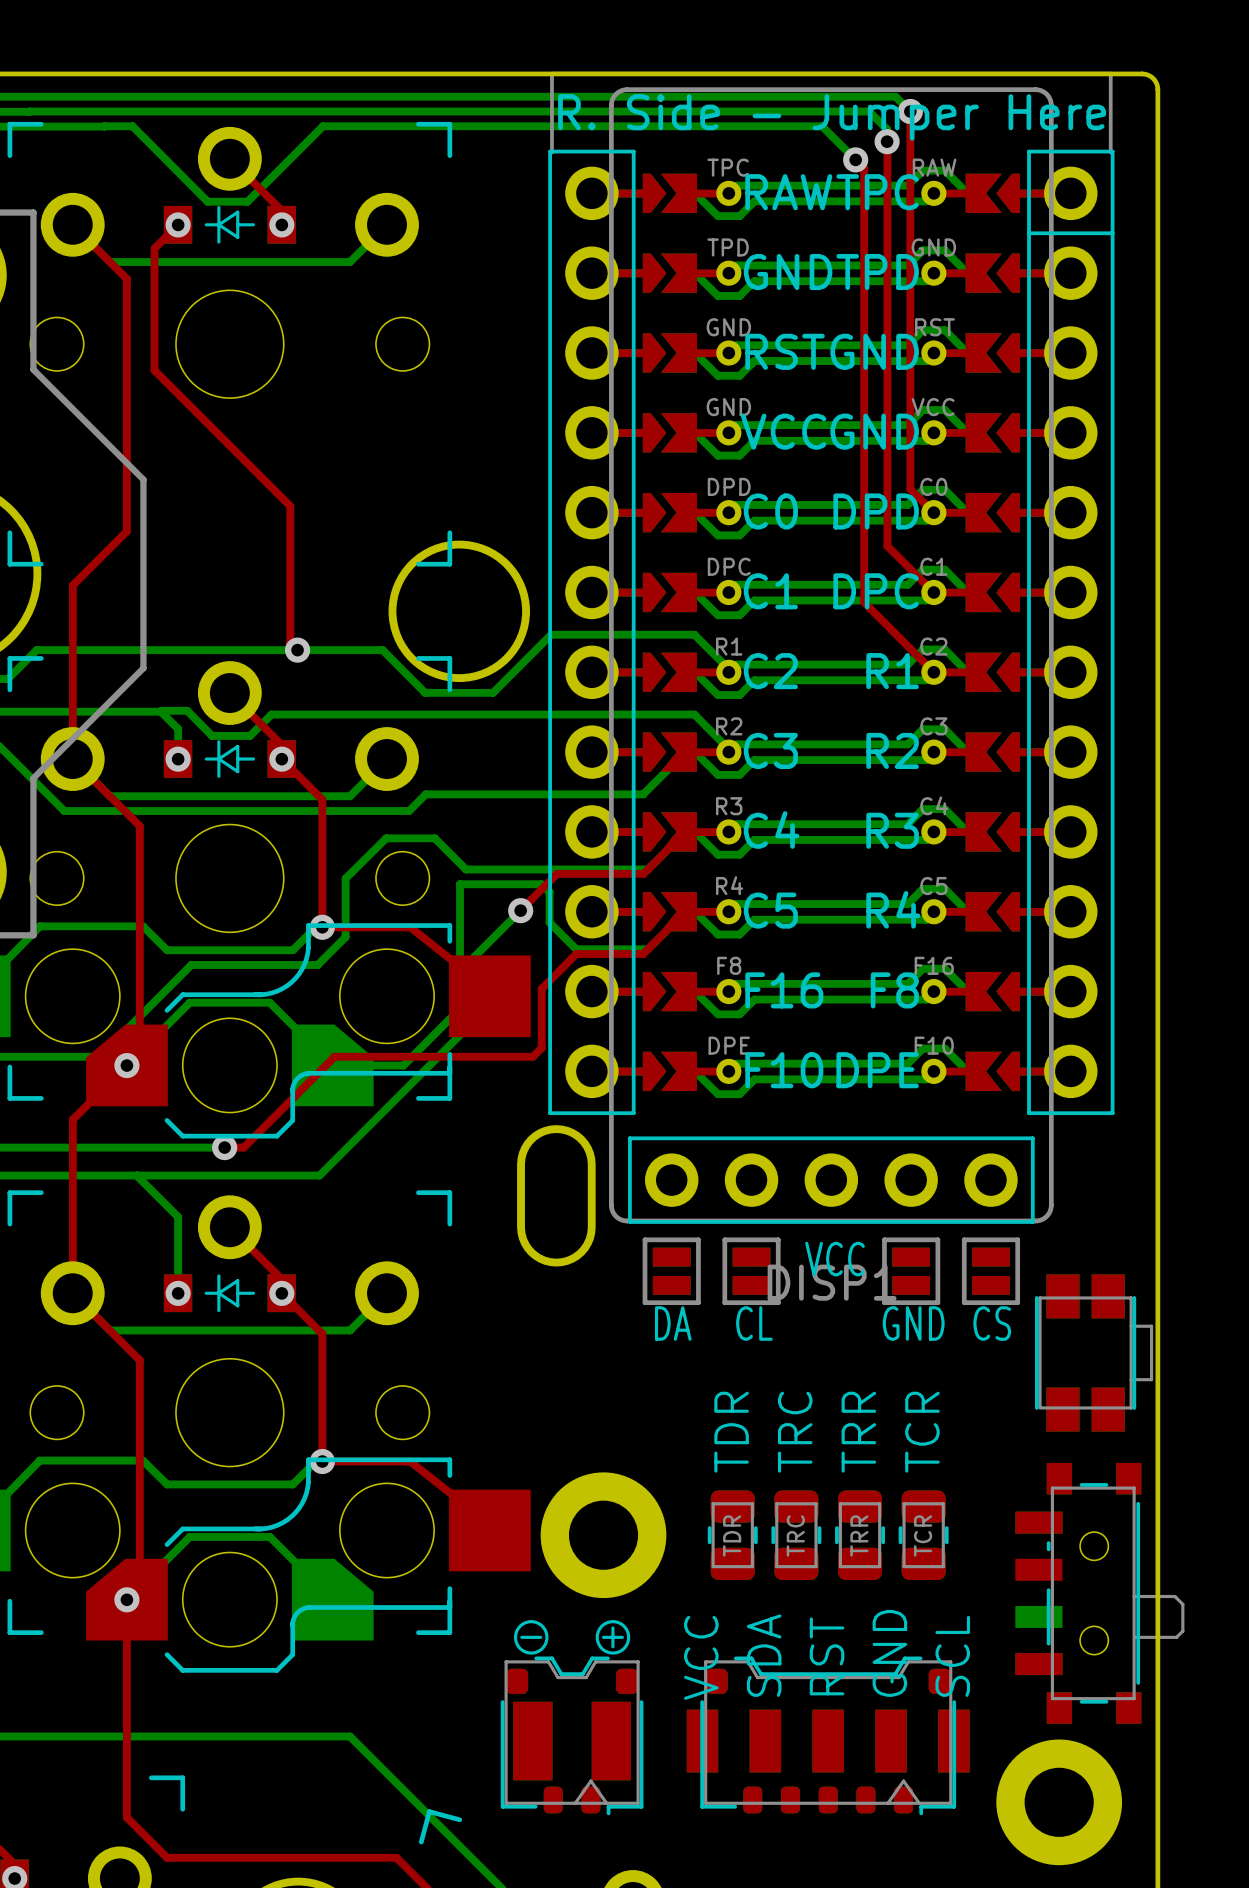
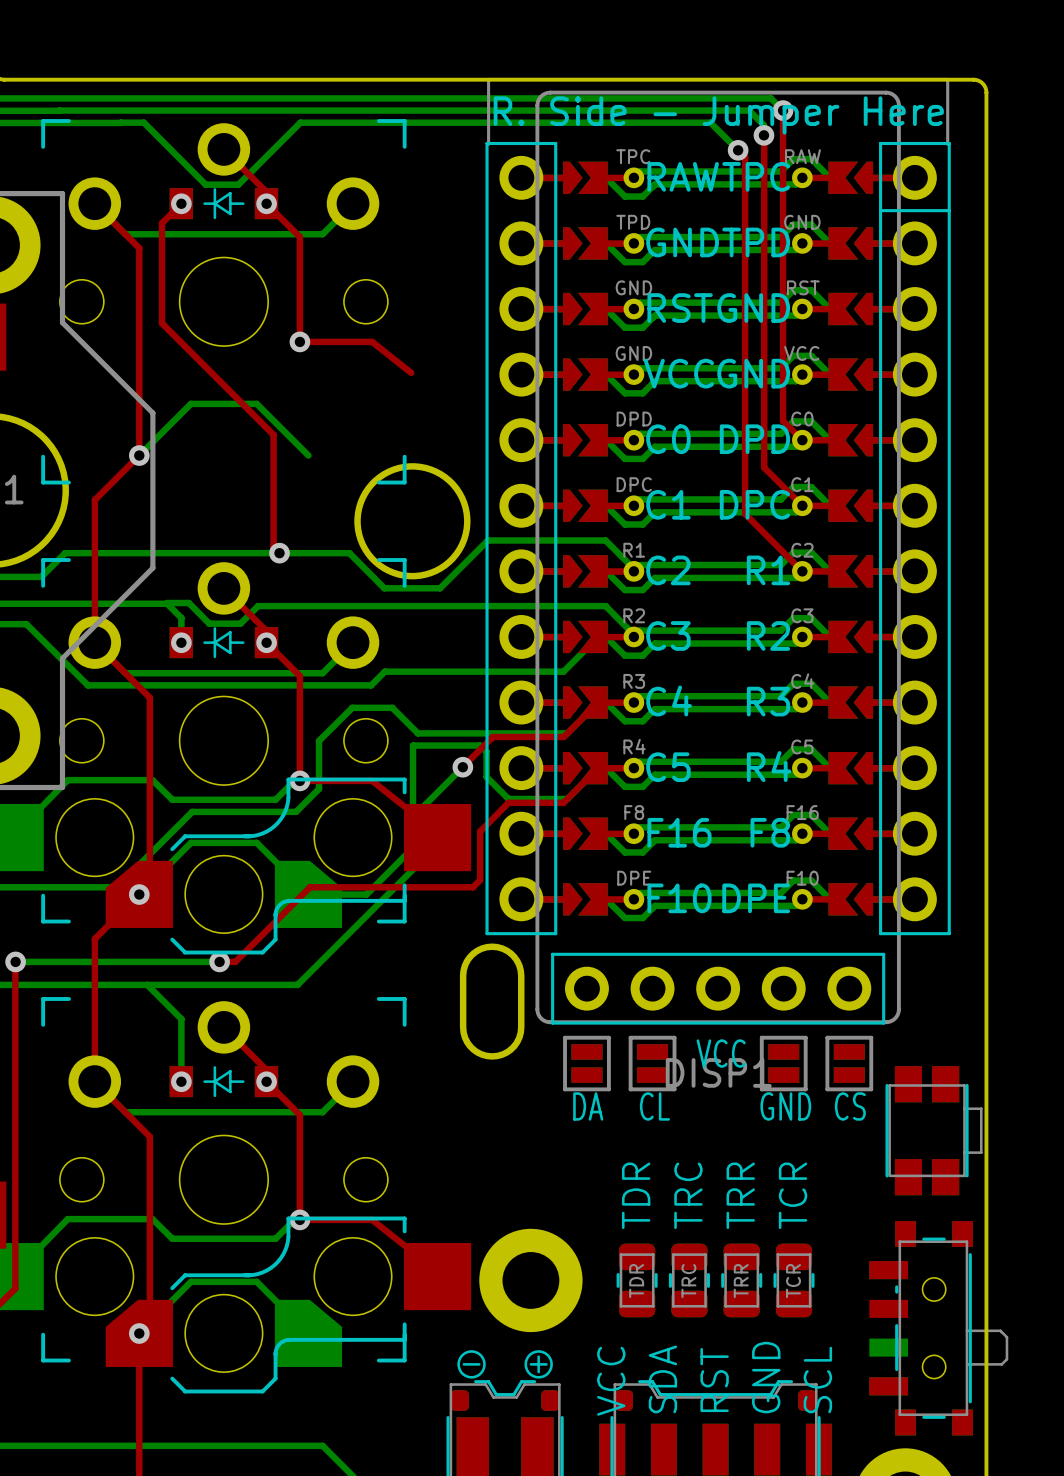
top track: none -> (266, 203) (299, 237) (299, 341) (372, 341) (411, 372)
via: none -> (299, 341)
bottom track: none -> (139, 455) (190, 403) (256, 403) (308, 455)
via: none -> (139, 455)

